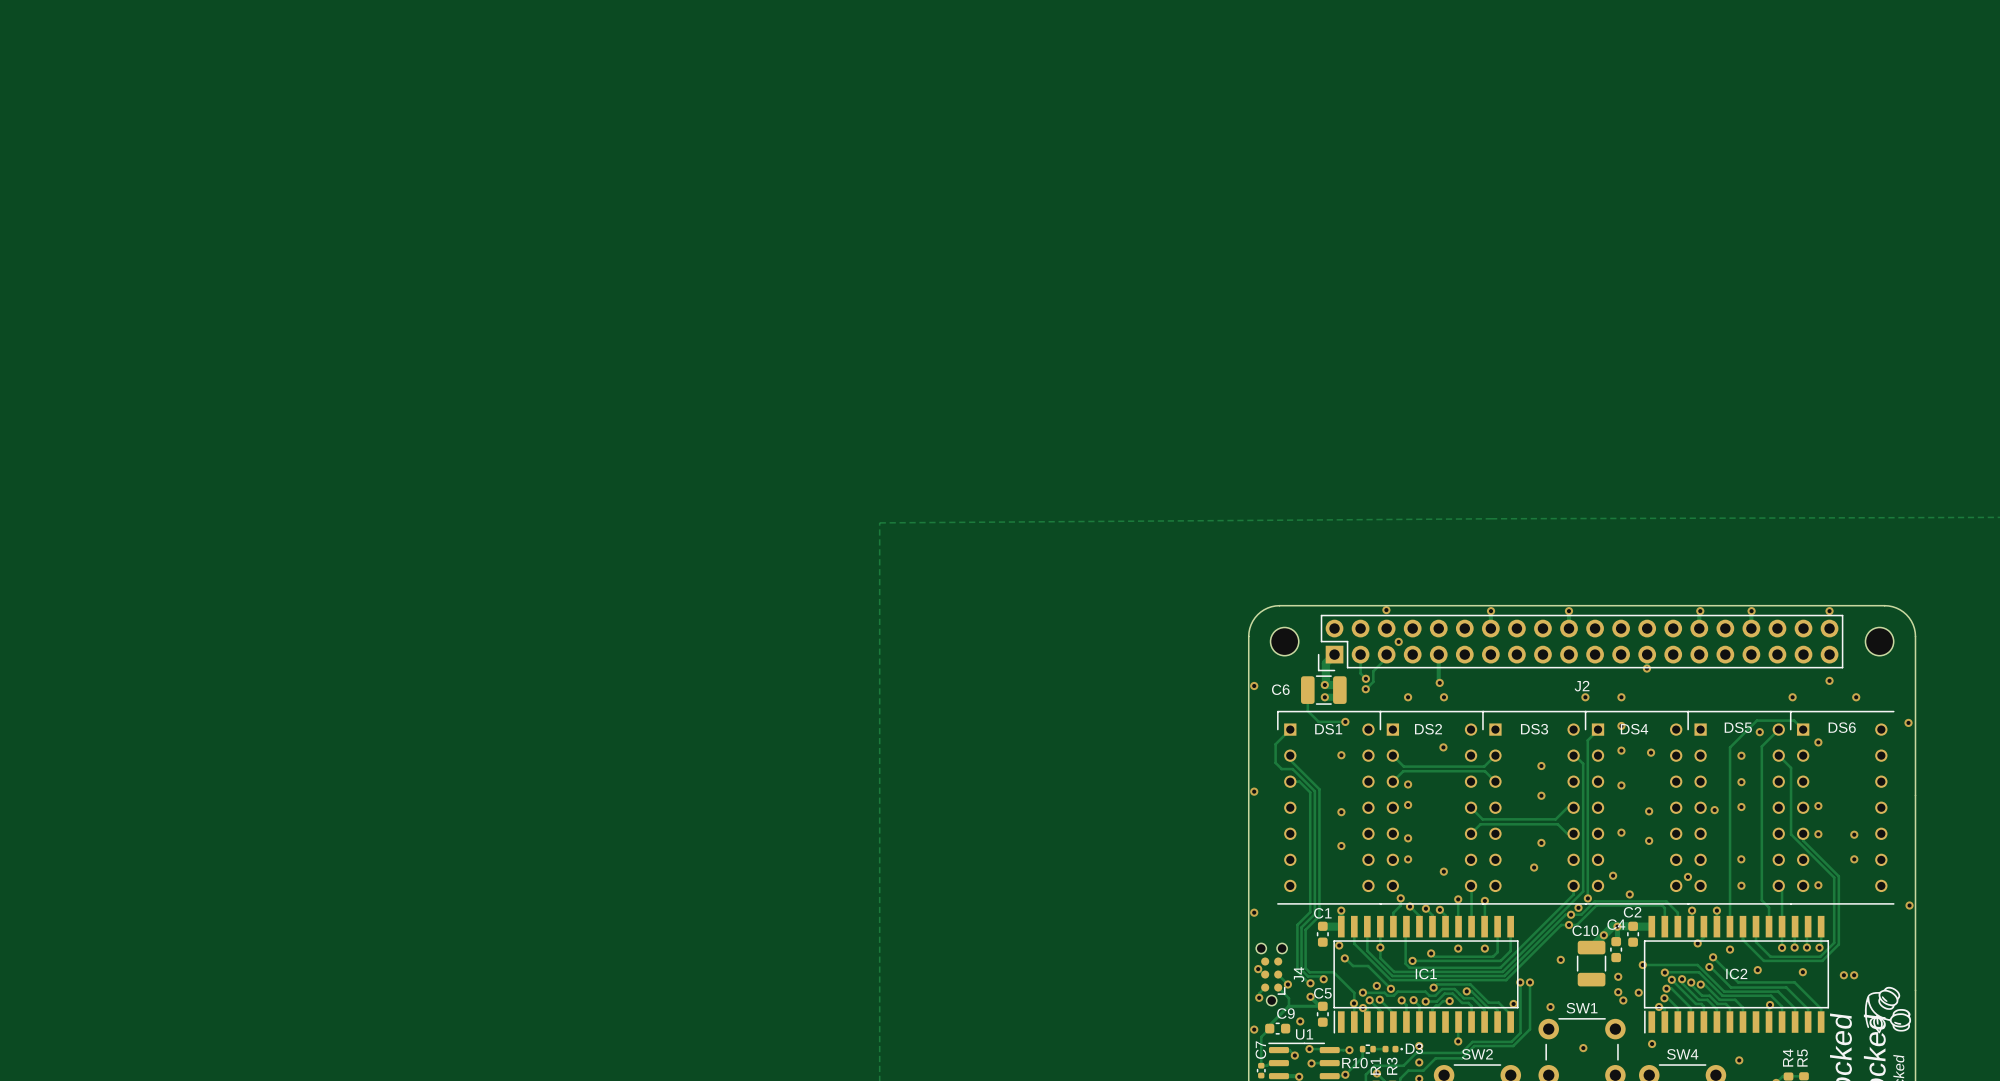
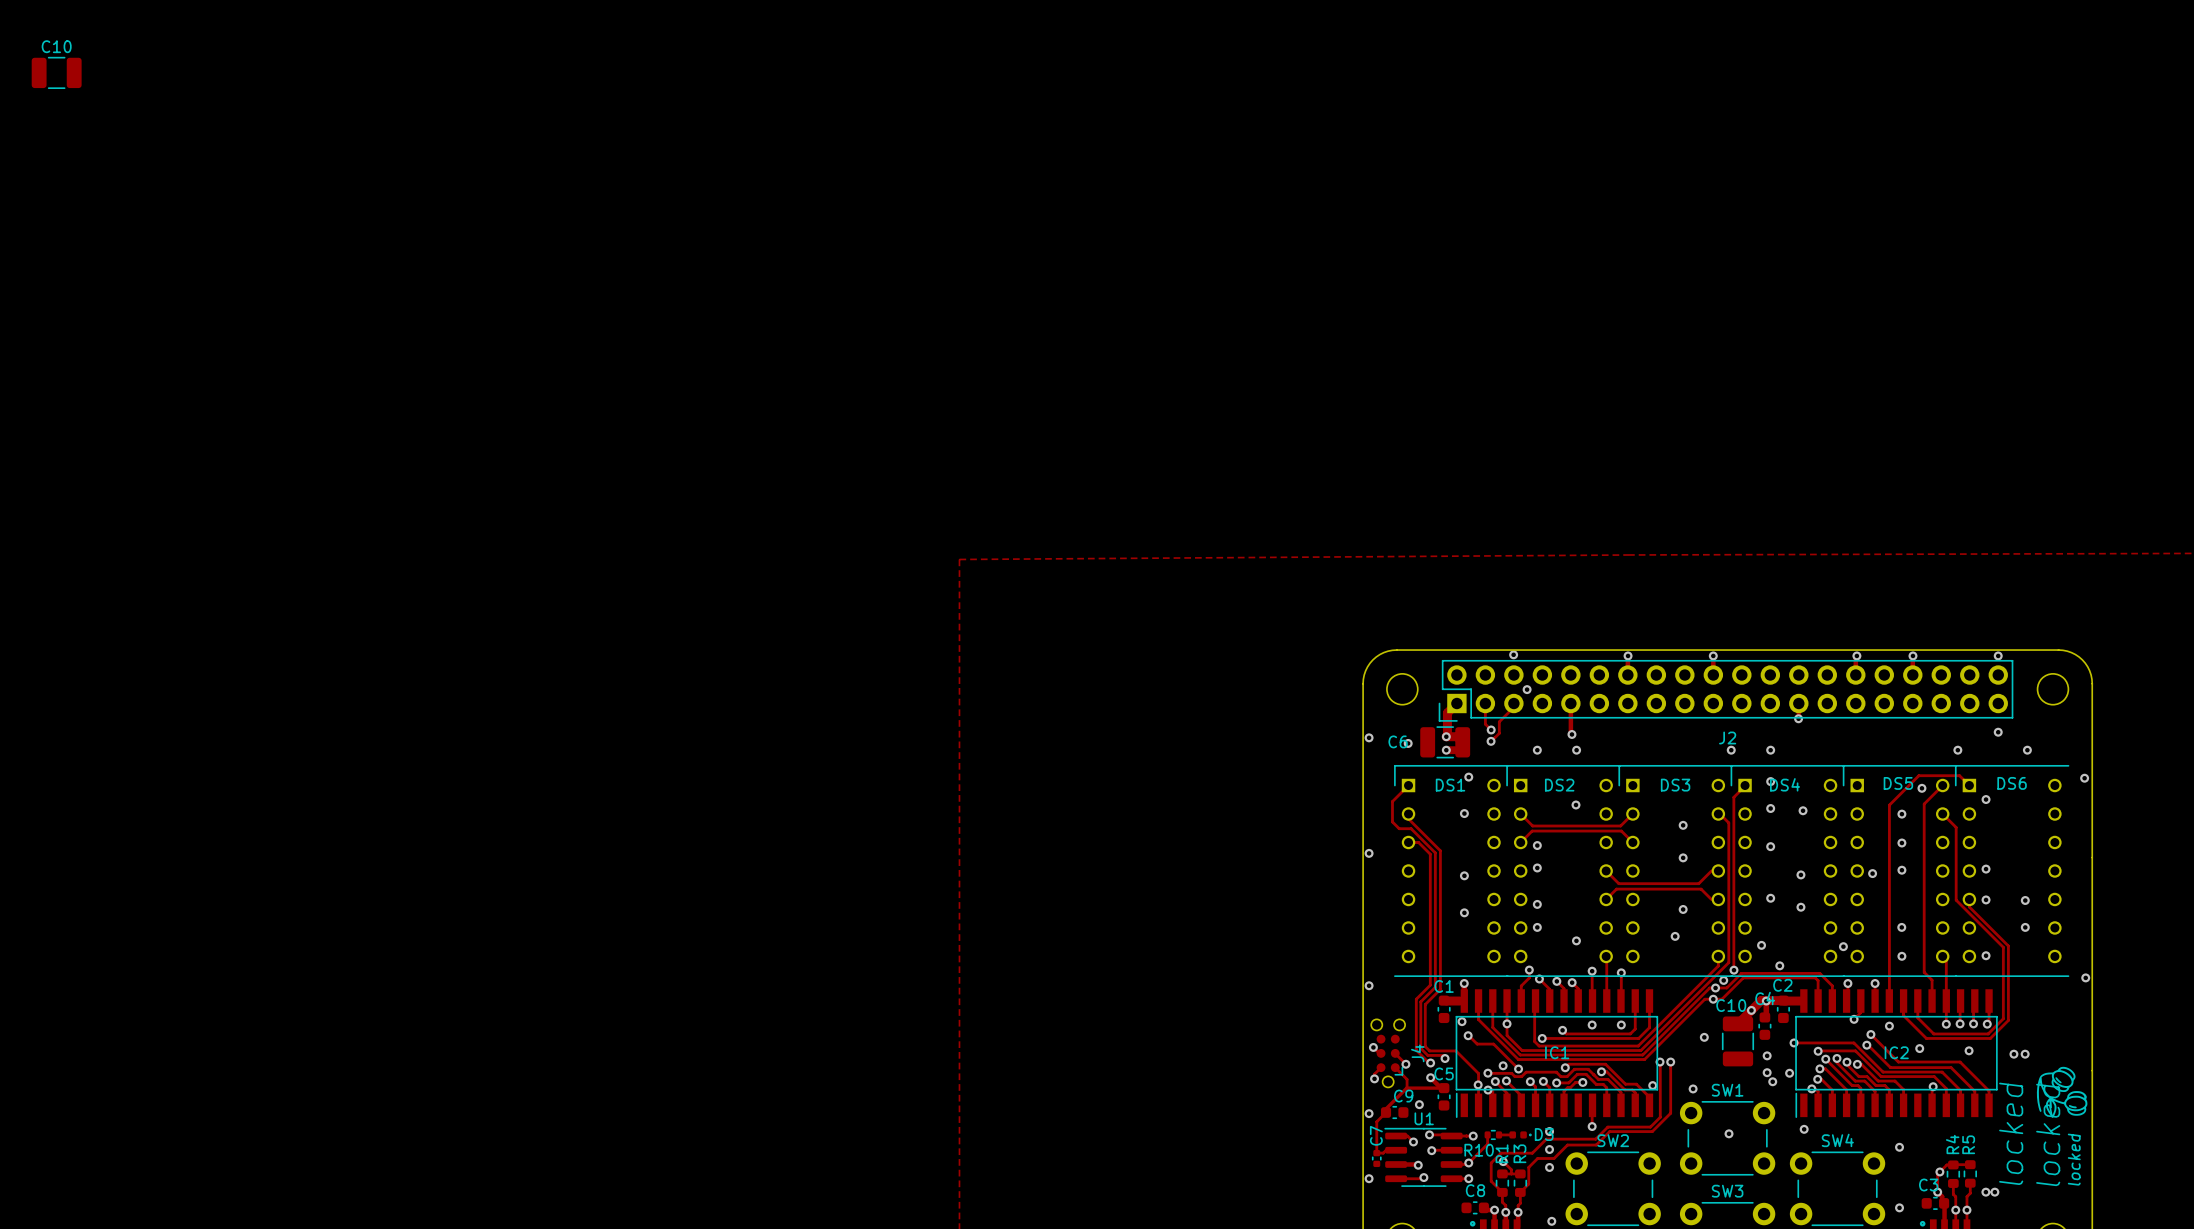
C10: none -> (56, 72)
track: (1307, 690) (1307, 710) (1318, 721) (1345, 721) -> none
via: none -> (1408, 743)

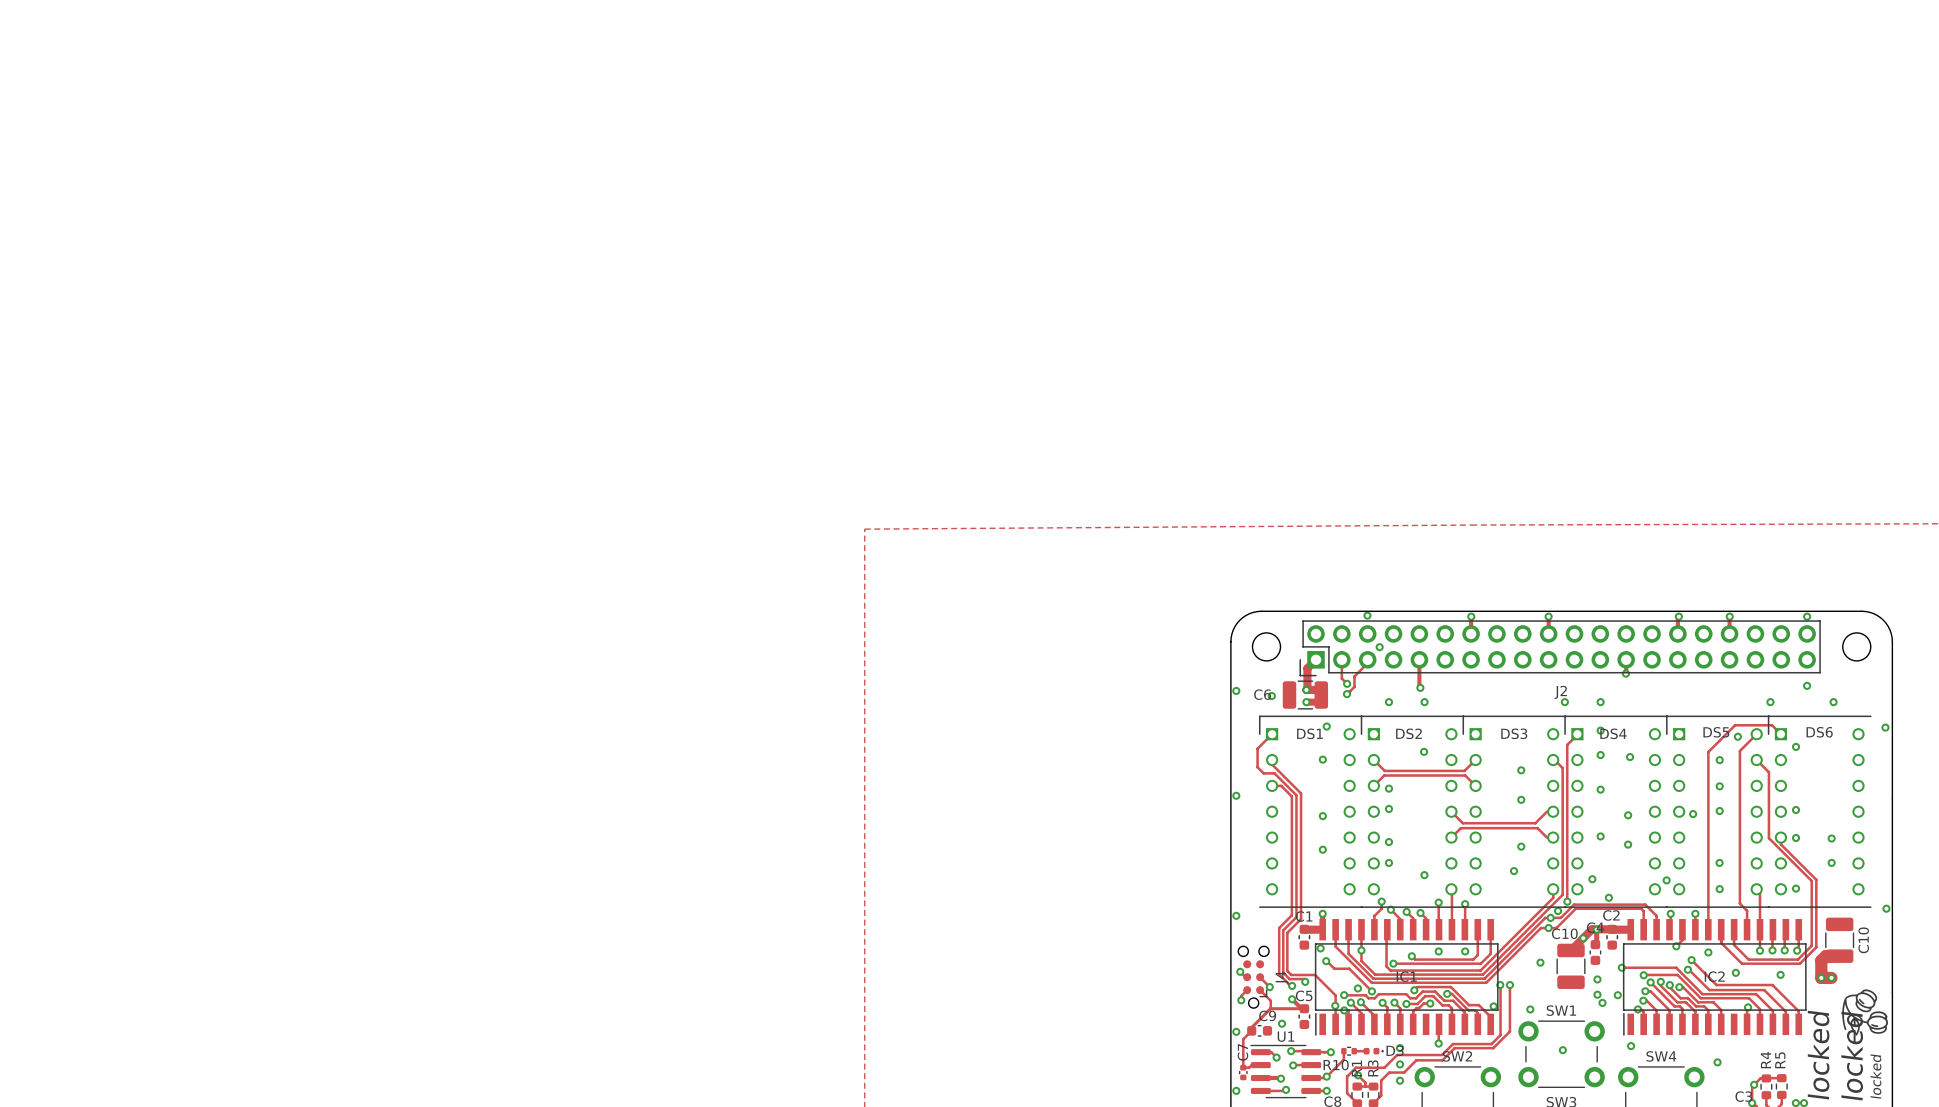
C10: (56, 72) -> none
C10: none -> (1839, 940)
track: none -> (1839, 956) (1825, 956) (1821, 960) (1821, 977) (1831, 977)

